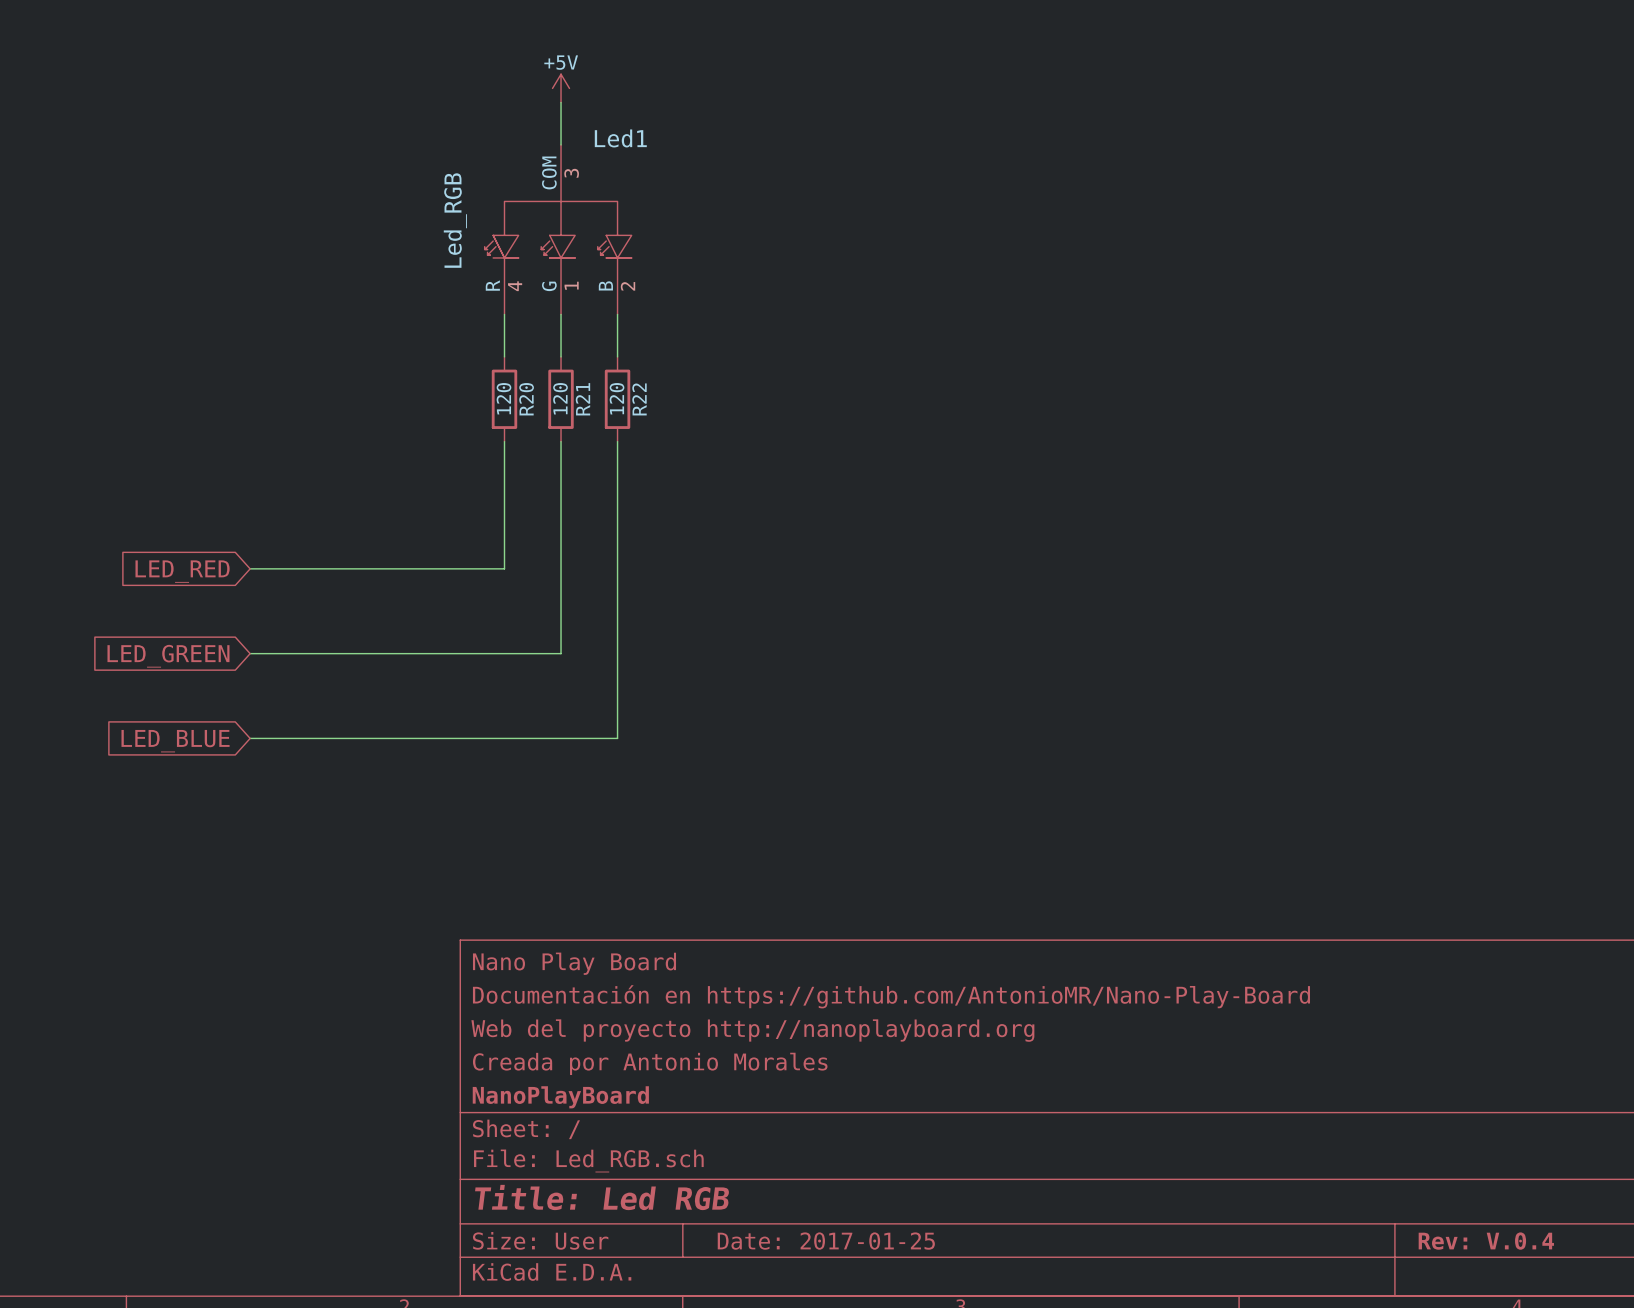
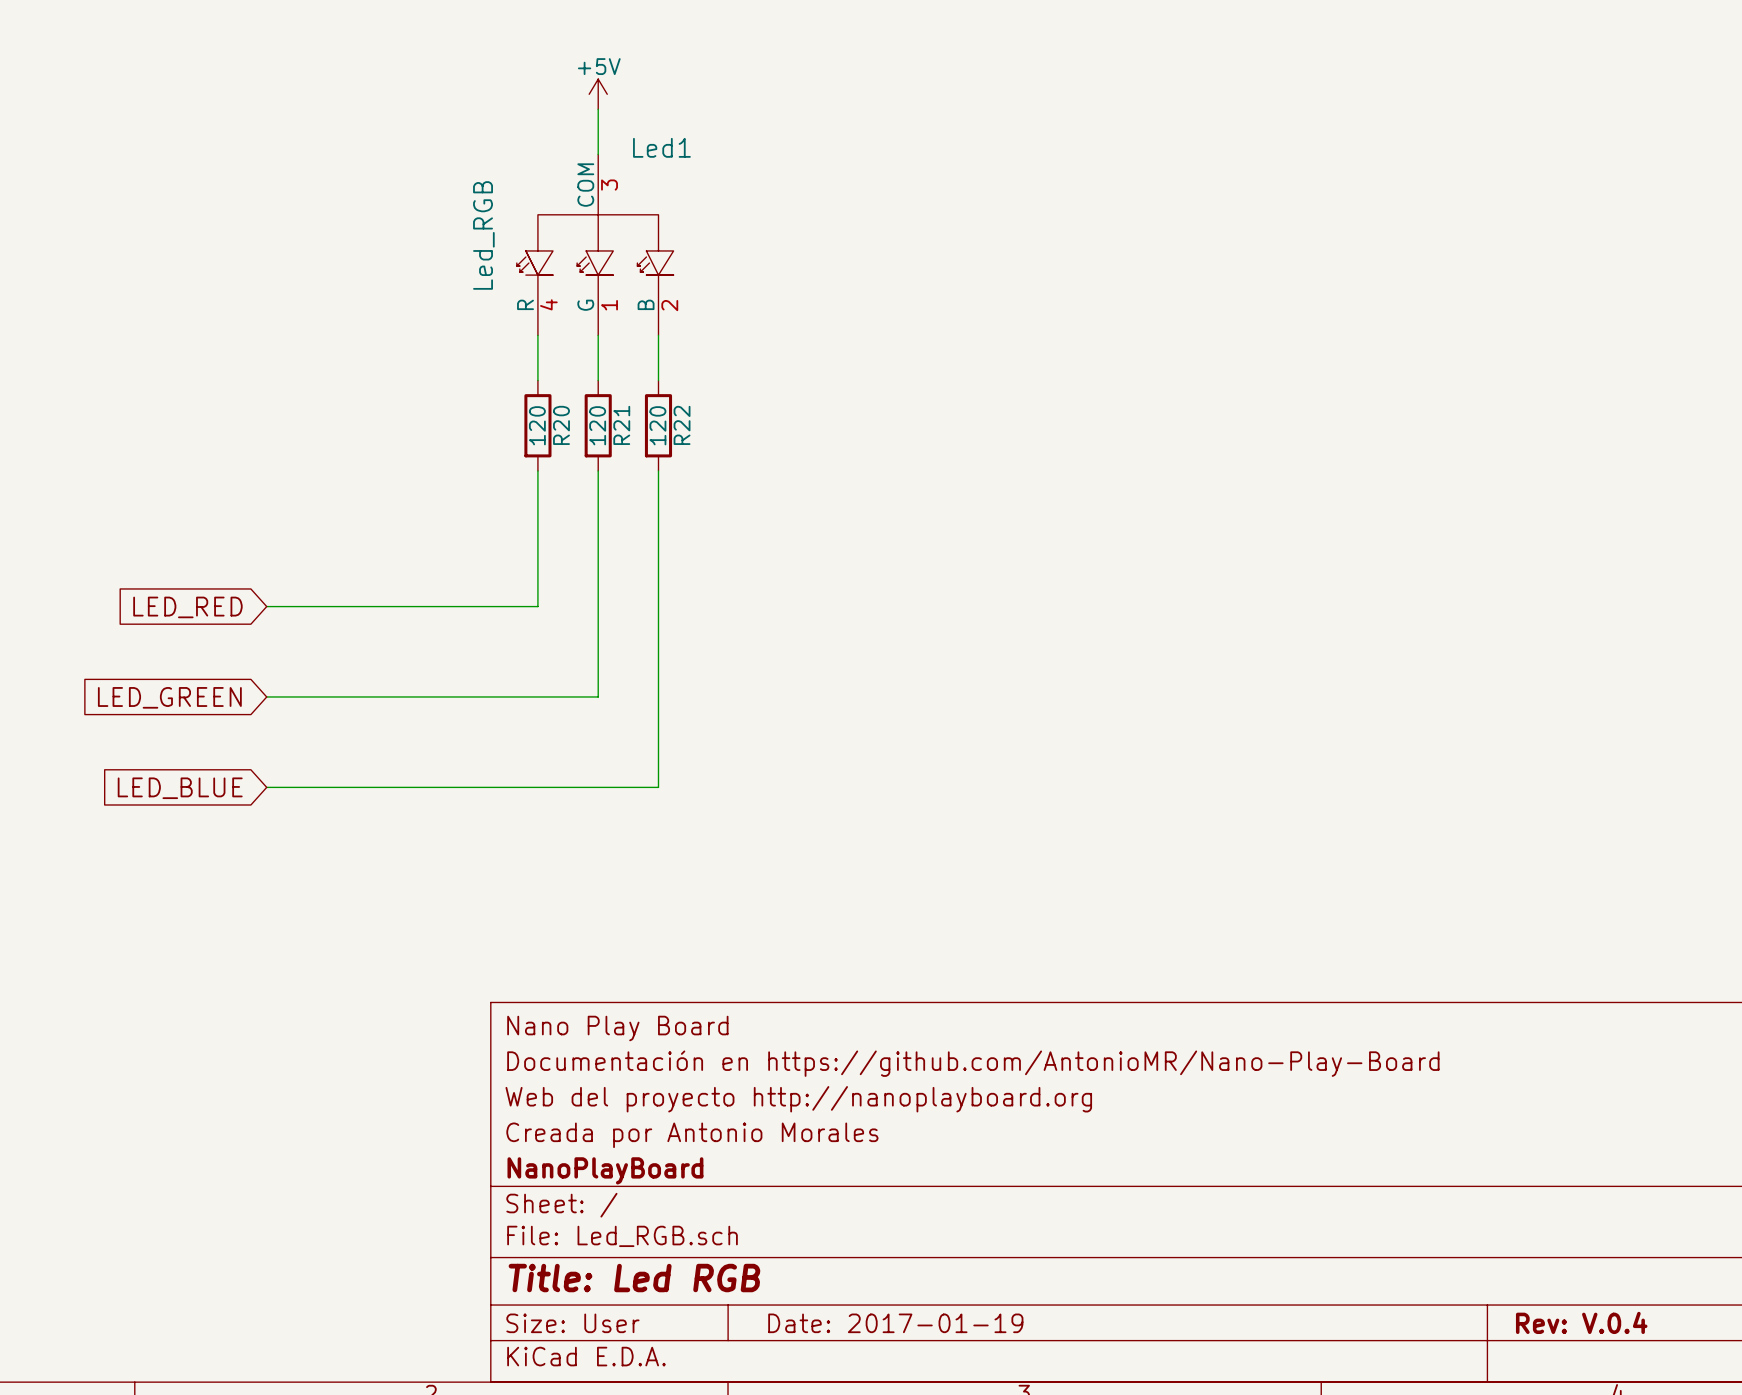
title block: Date: 2017-01-25 (826, 1241) -> Date: 2017-01-19 (895, 1323)

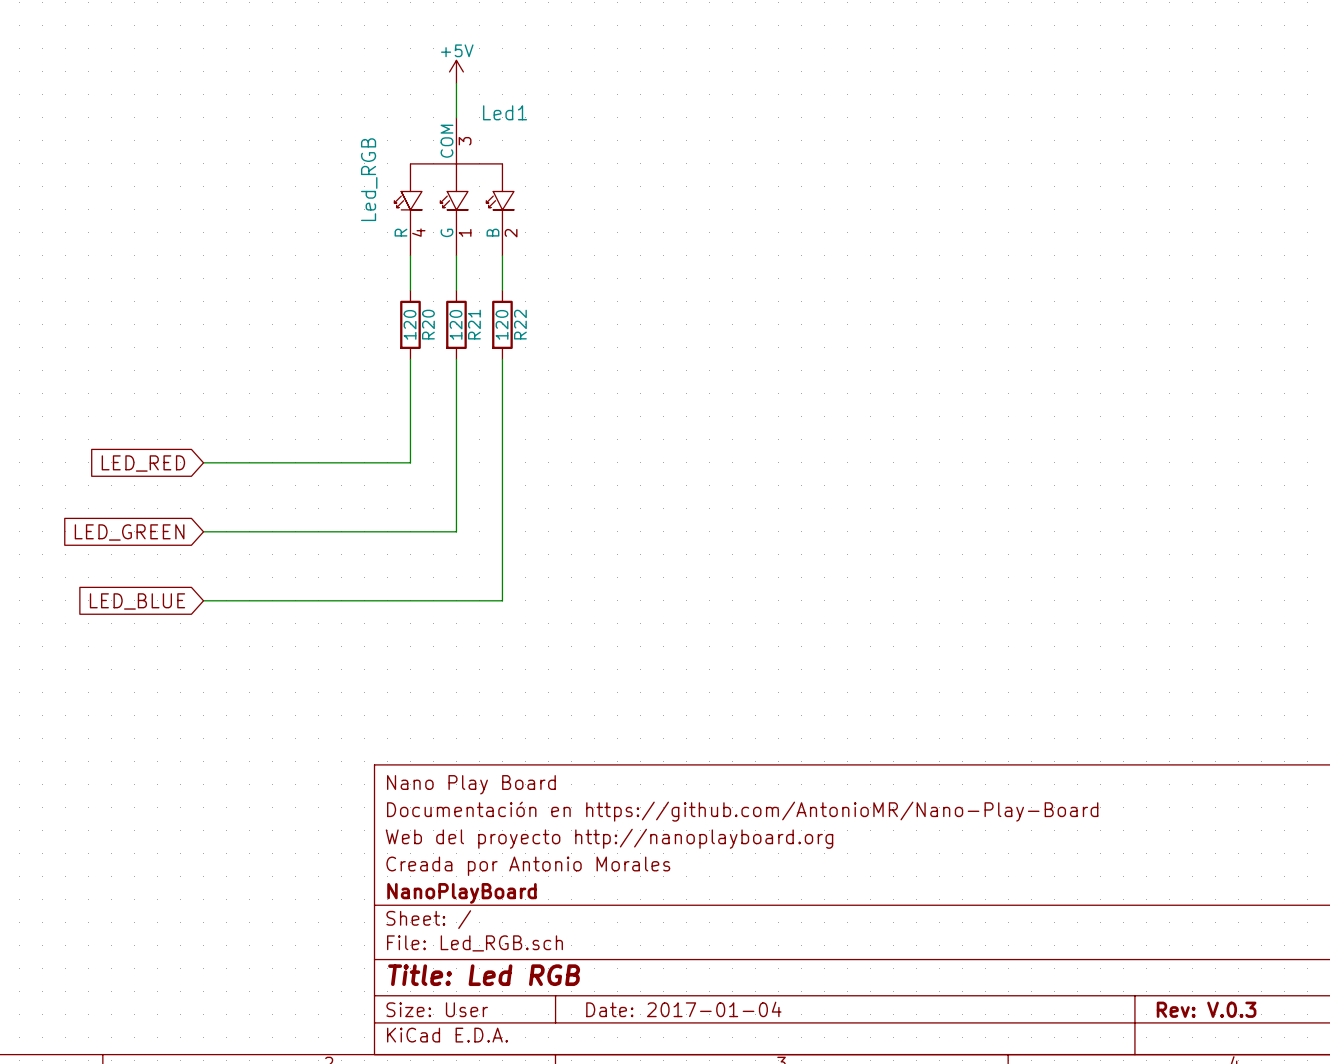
title block: Rev: V.0.4 (1581, 1322) -> Rev: V.0.3 (1206, 1009)
title block: Date: 2017-01-19 (895, 1323) -> Date: 2017-01-04 (683, 1009)

